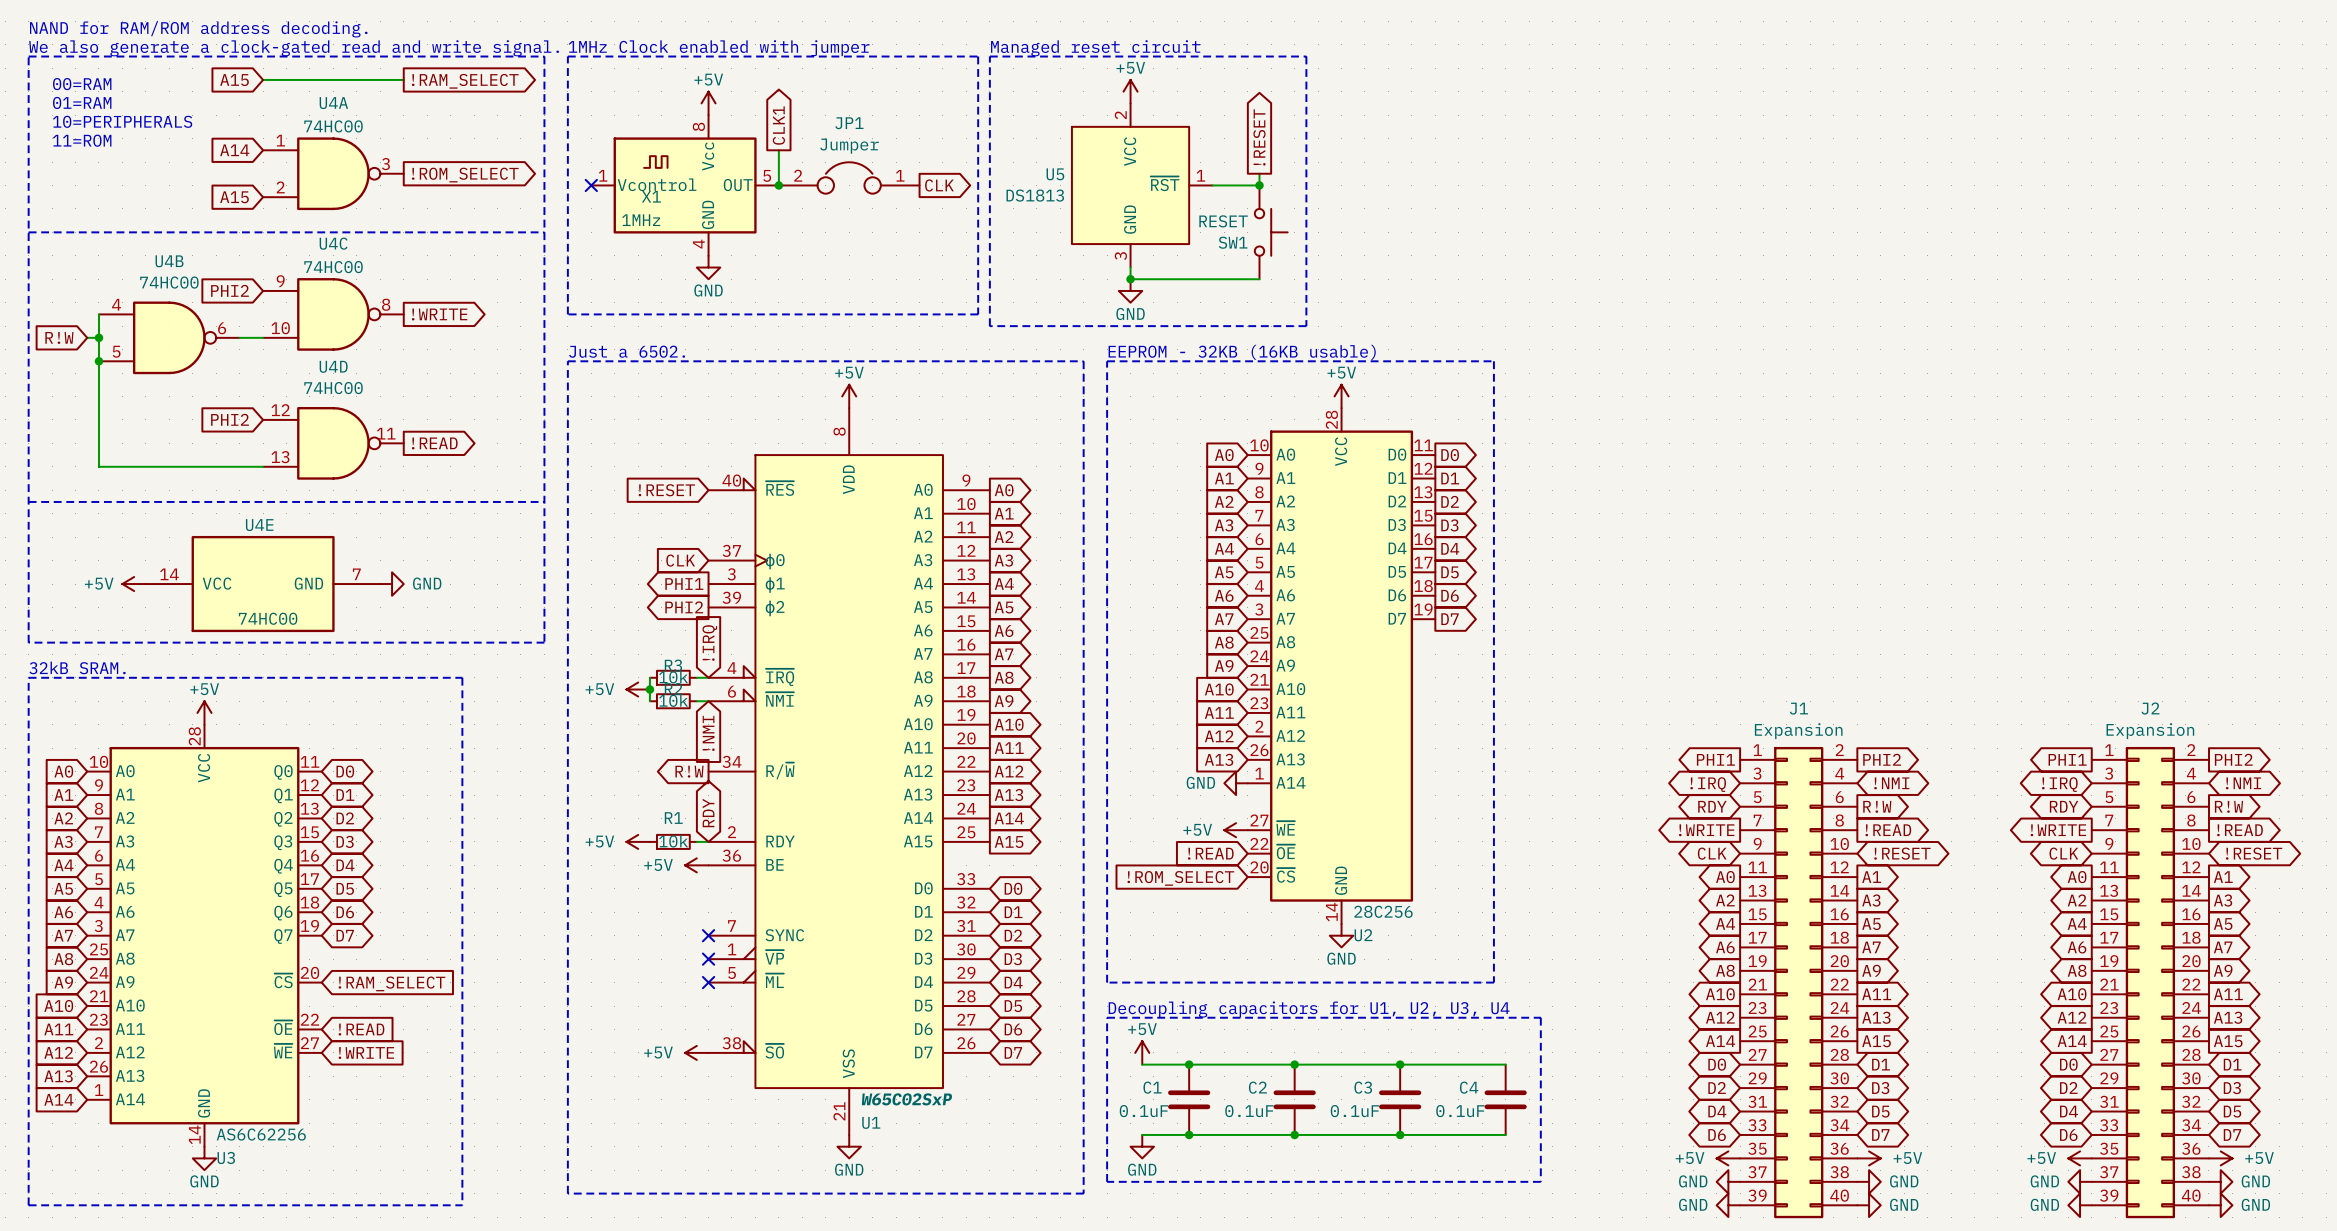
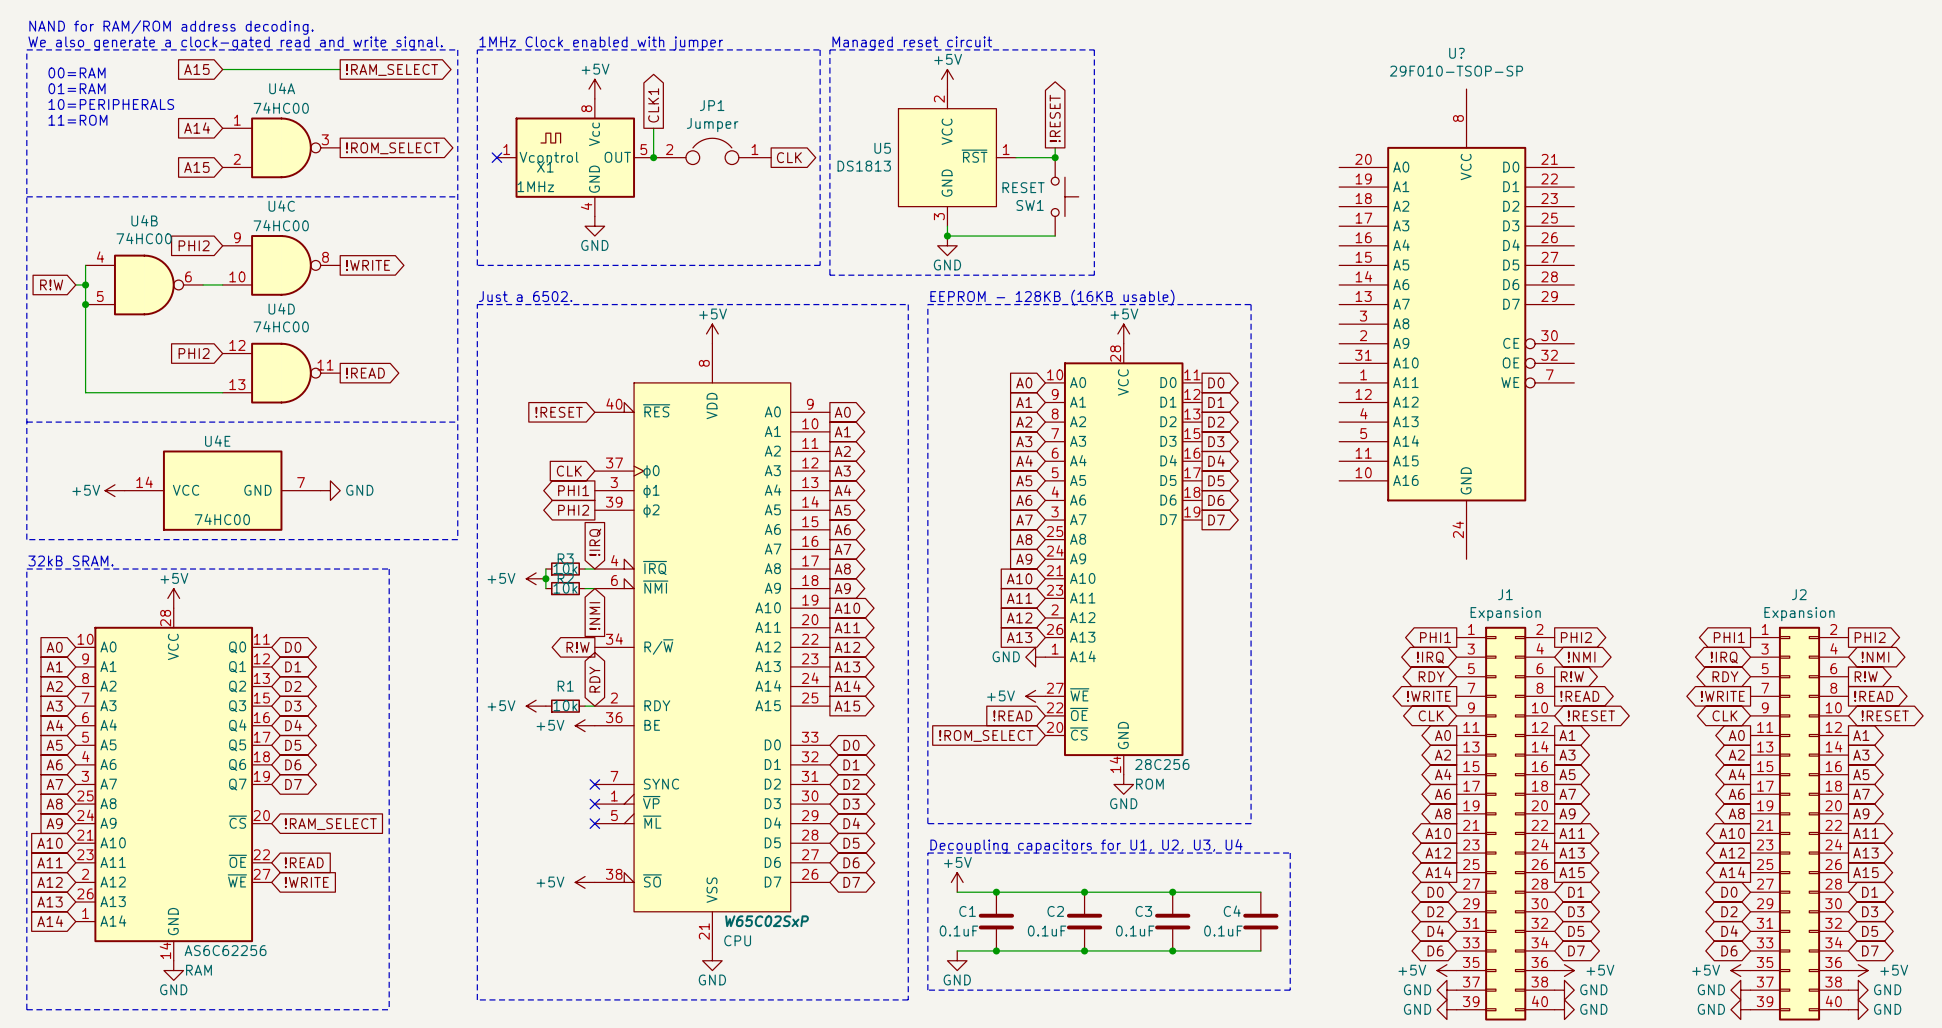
text: EEPROM - 32KB (16KB usable) (1242, 352) -> EEPROM - 128KB (16KB usable) (1052, 297)
U?: none -> 29F010-TSOP-SP (1456, 324)
U2 name: U2 (1363, 935) -> ROM (1149, 784)
U1 name: U1 (871, 1122) -> CPU (737, 940)
U3 name: U3 (226, 1157) -> RAM (198, 970)

